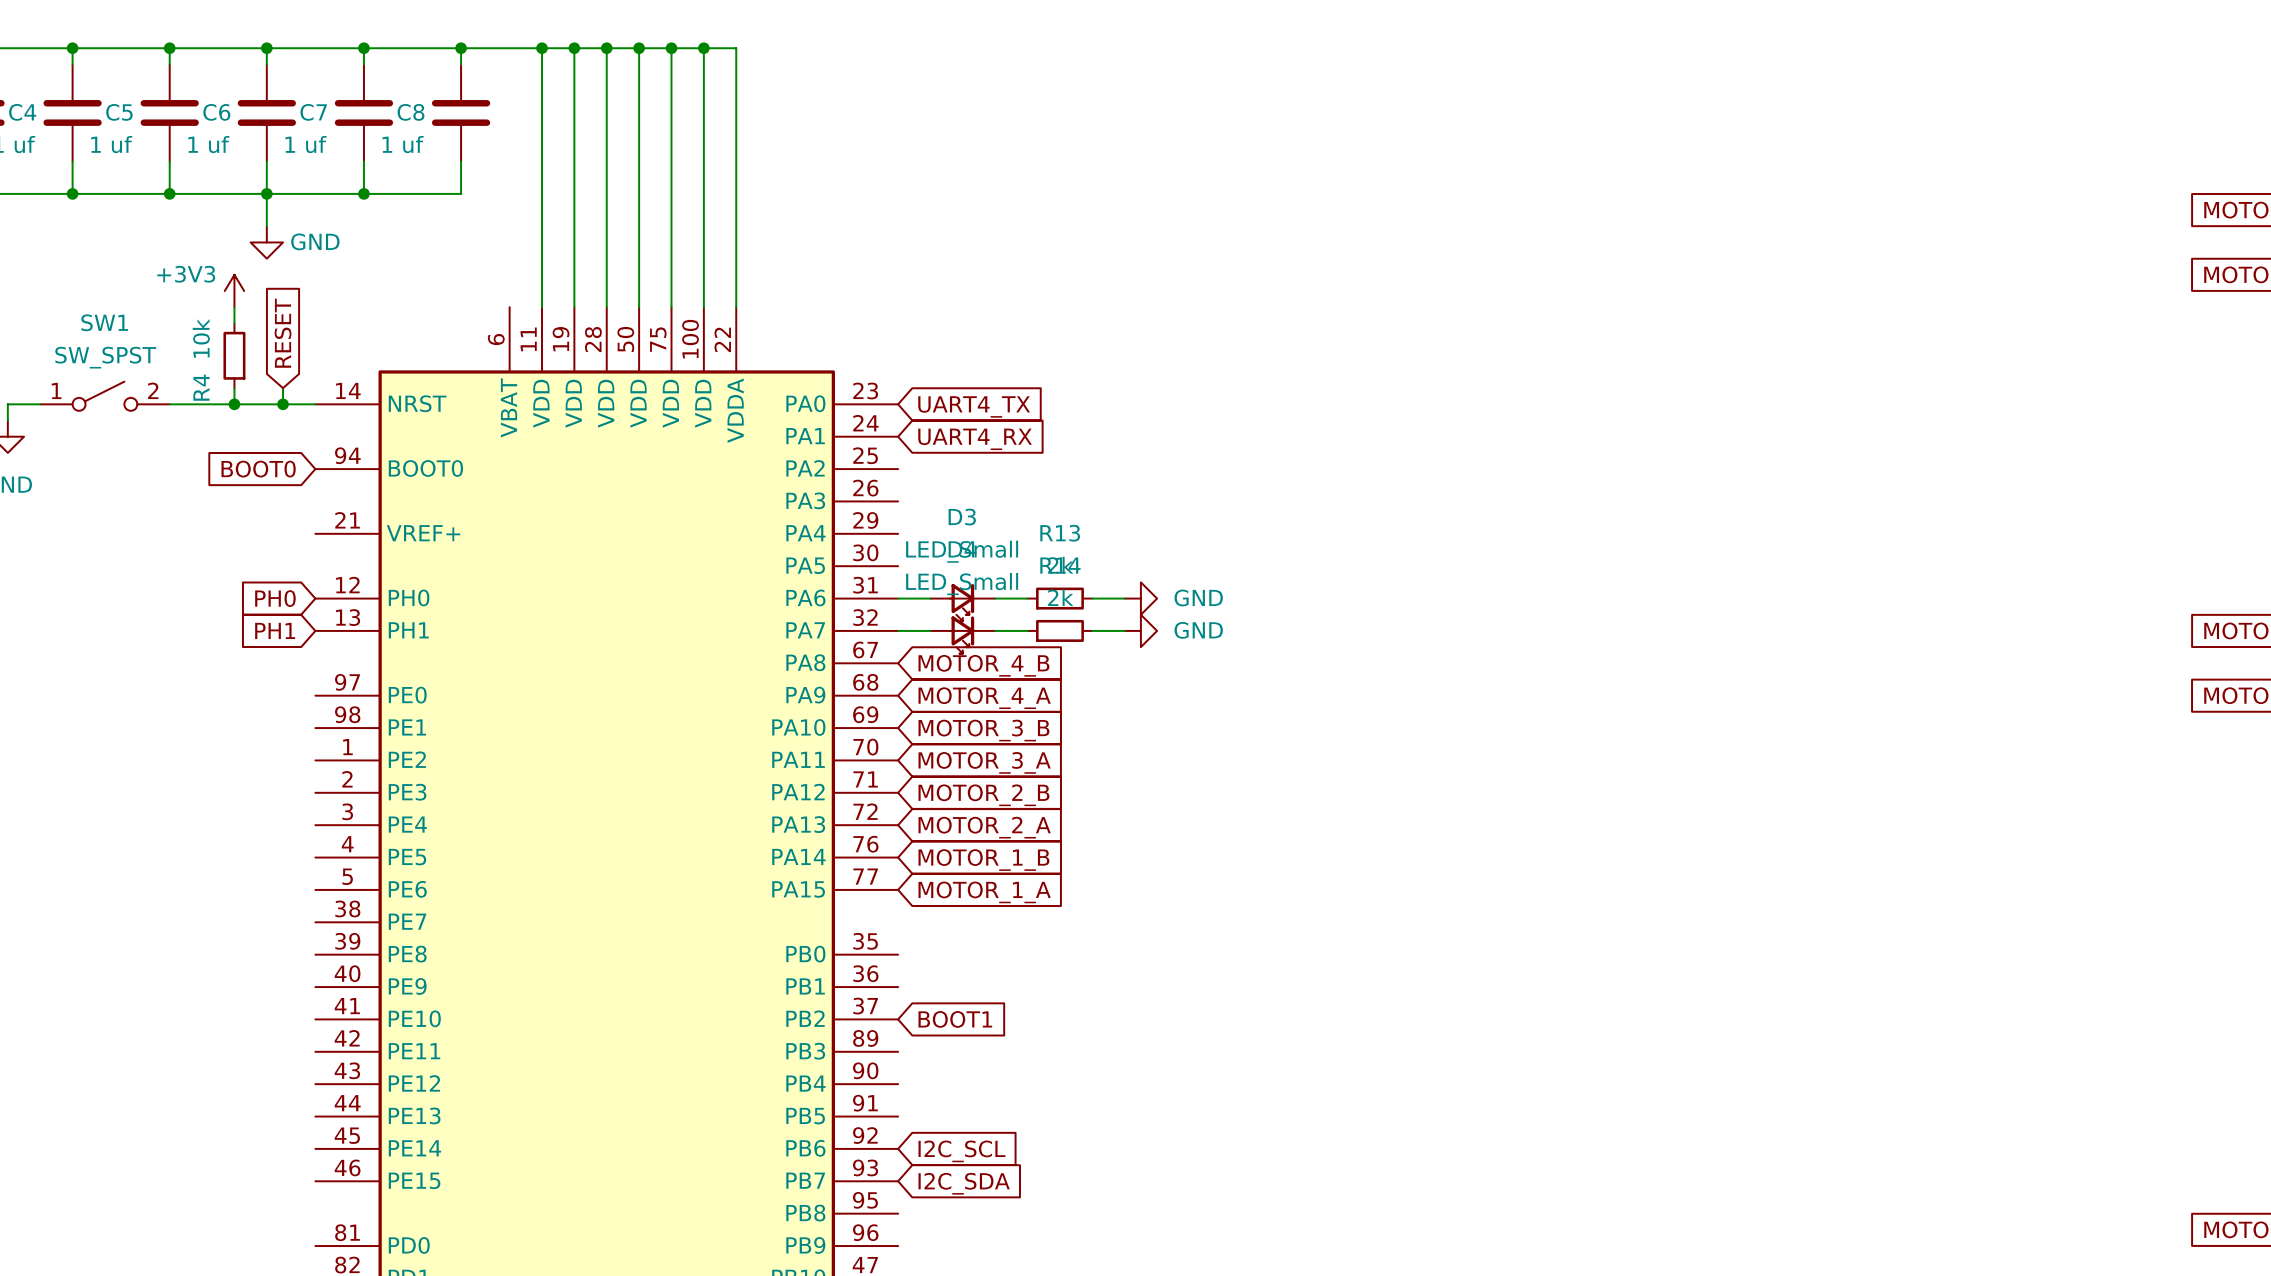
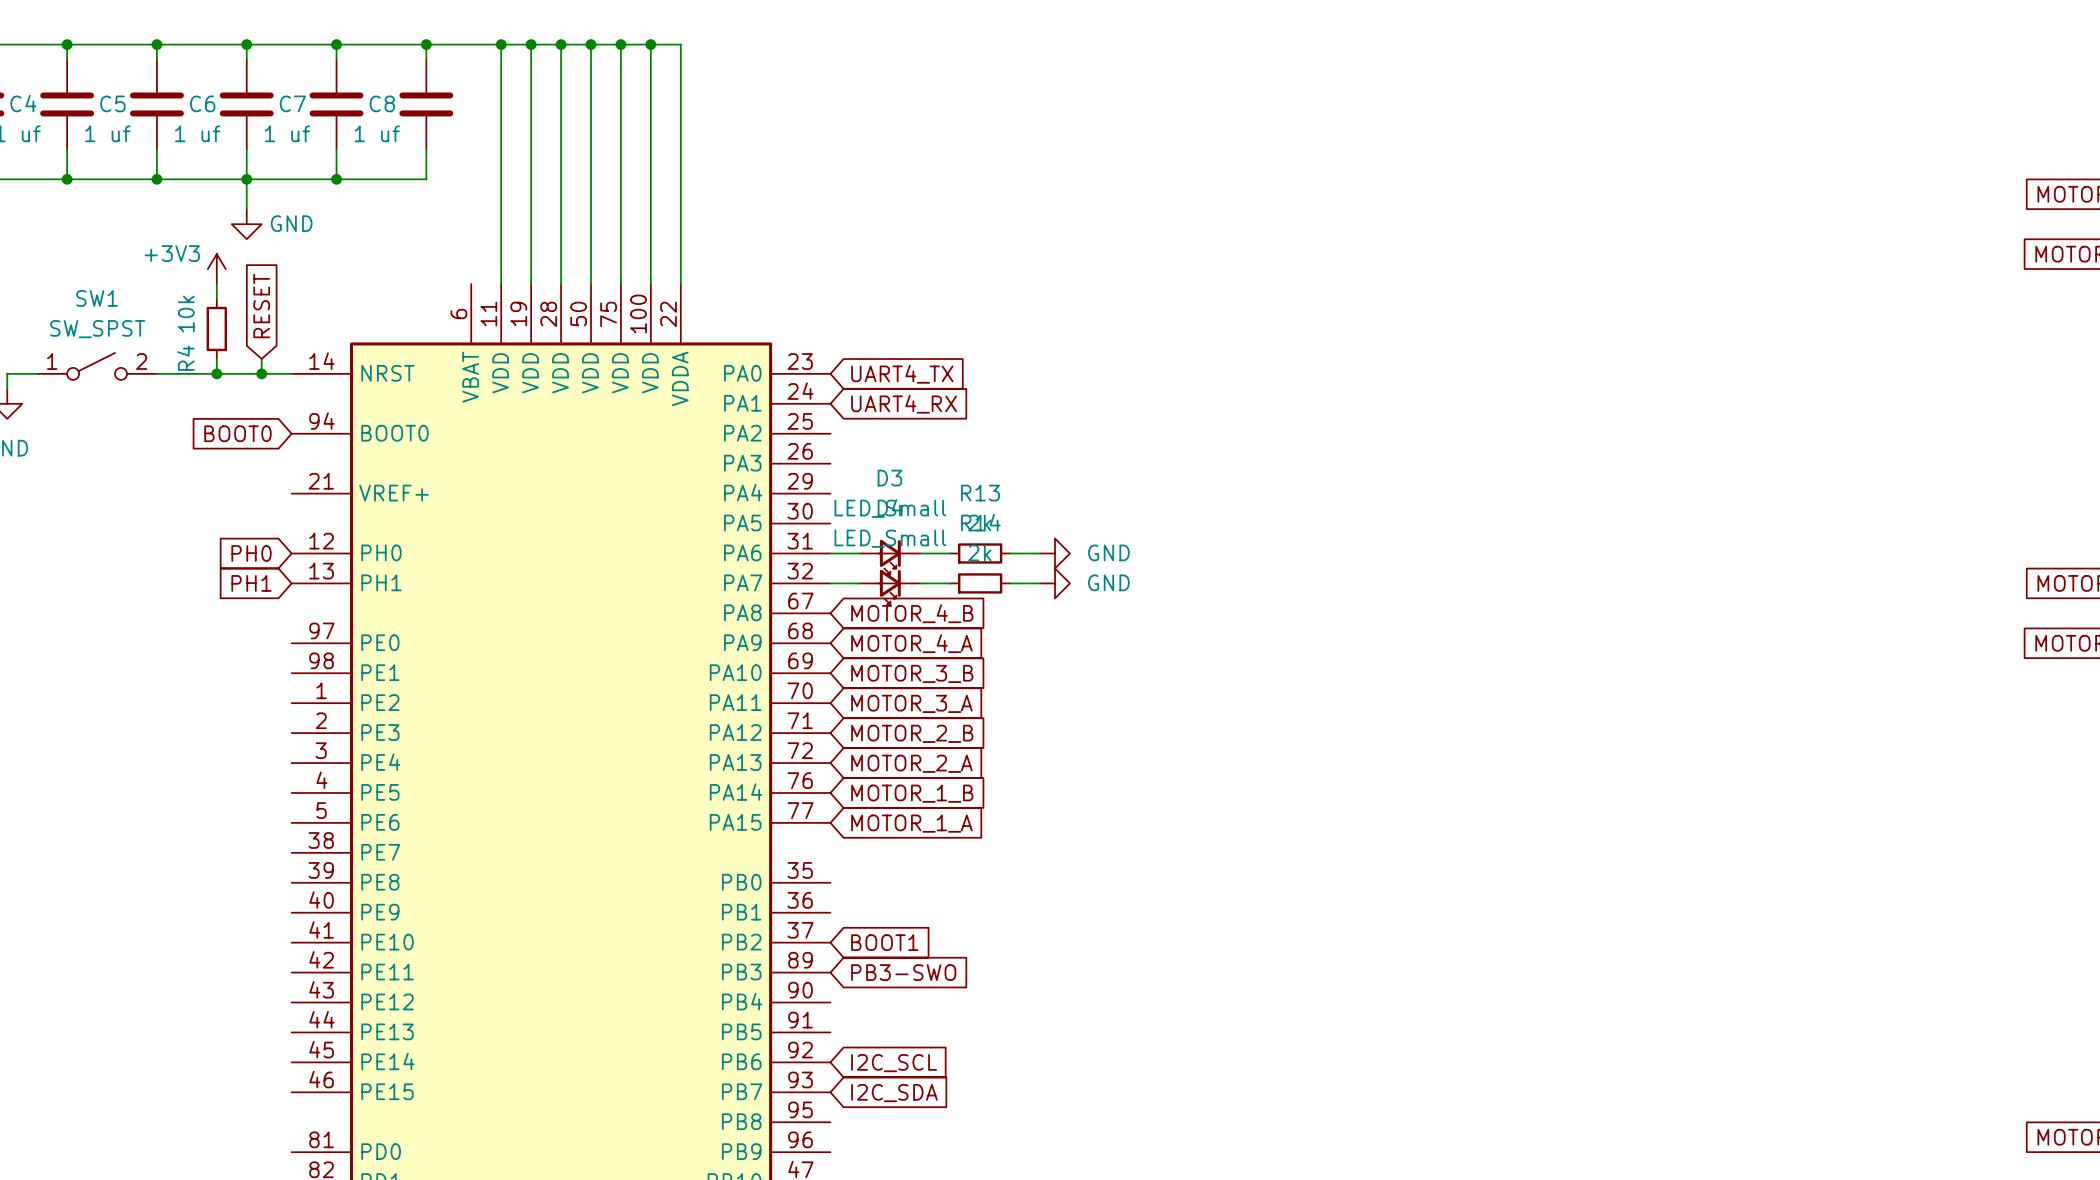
global label: none -> PB3-SWO (903, 972)

